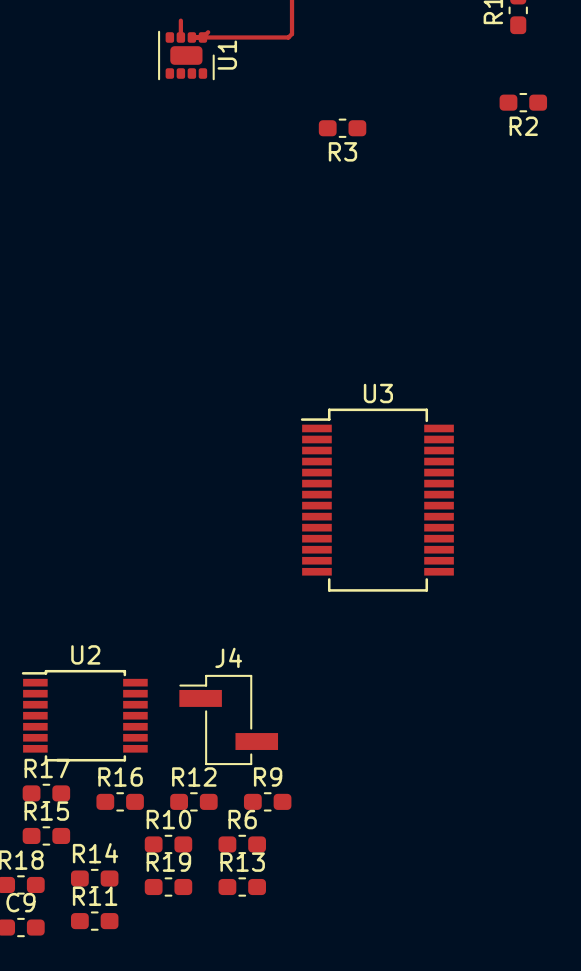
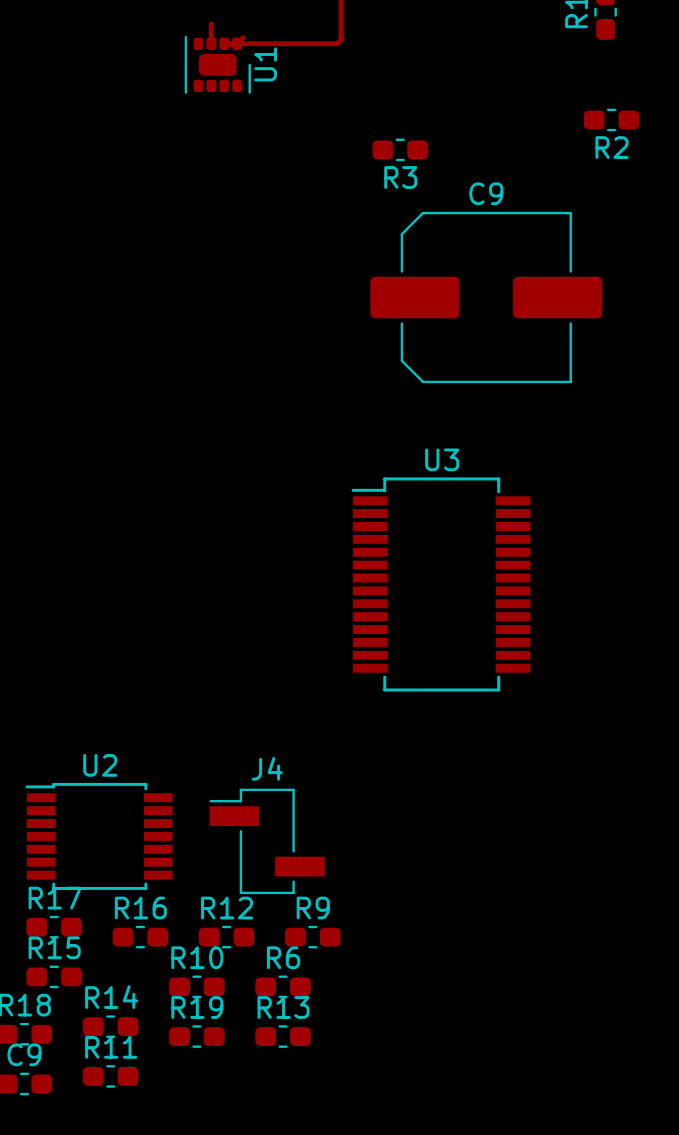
C9: none -> (486, 297)

